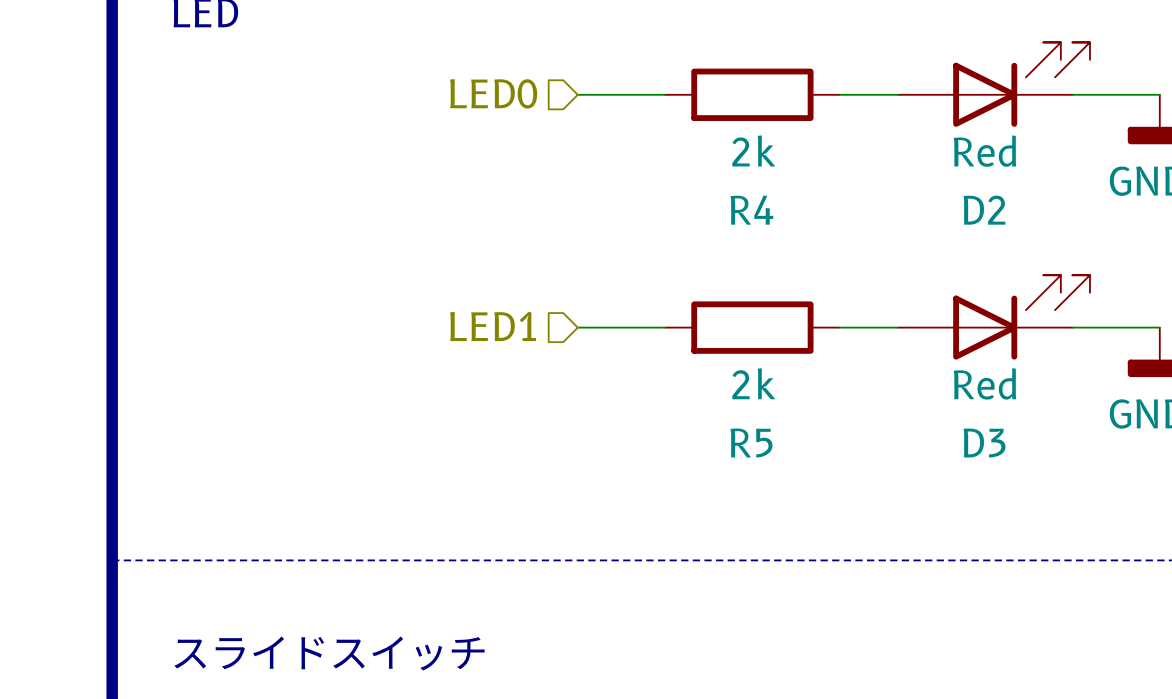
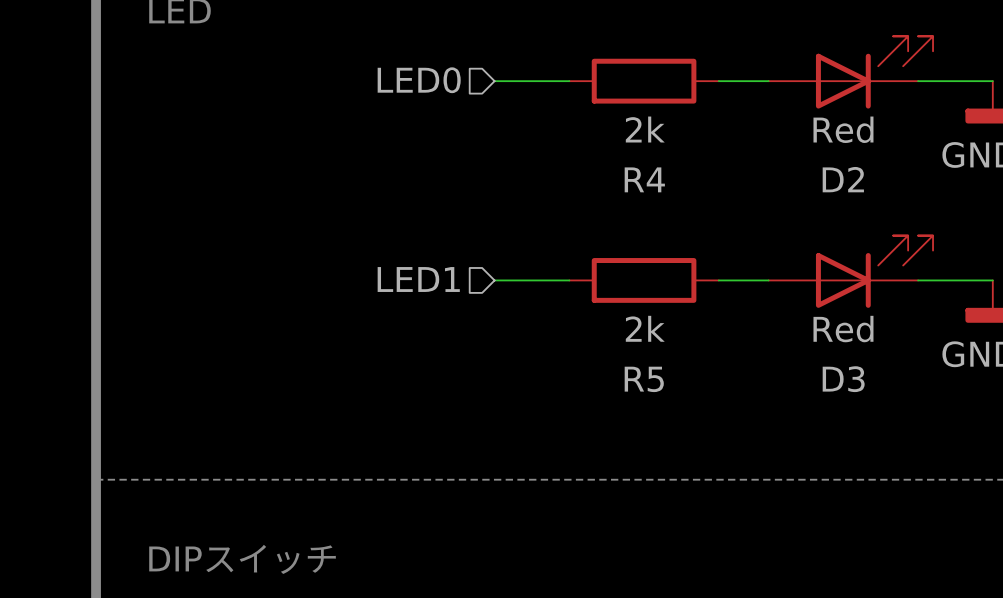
text: スライドスイッチ (329, 653) -> DIPスイッチ (242, 559)

